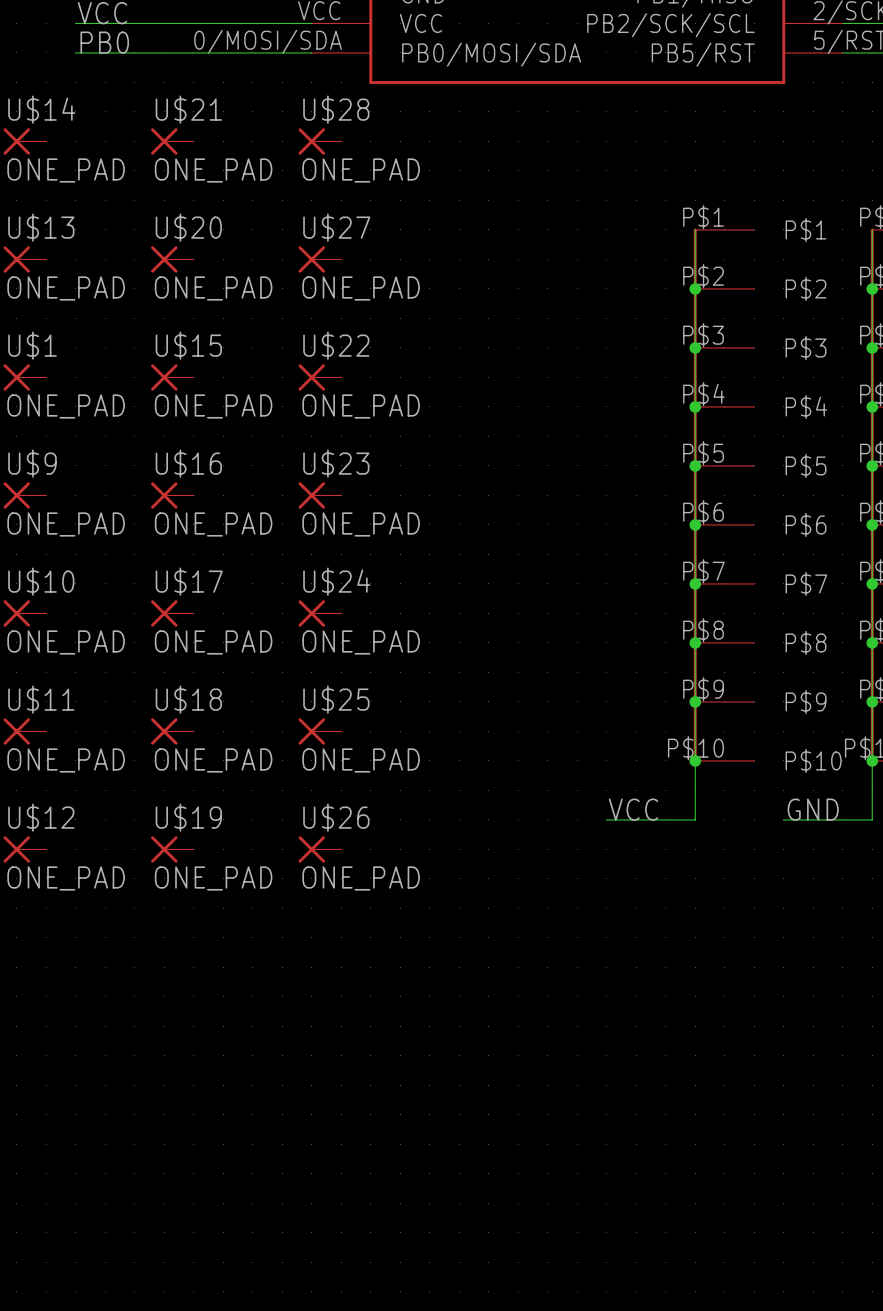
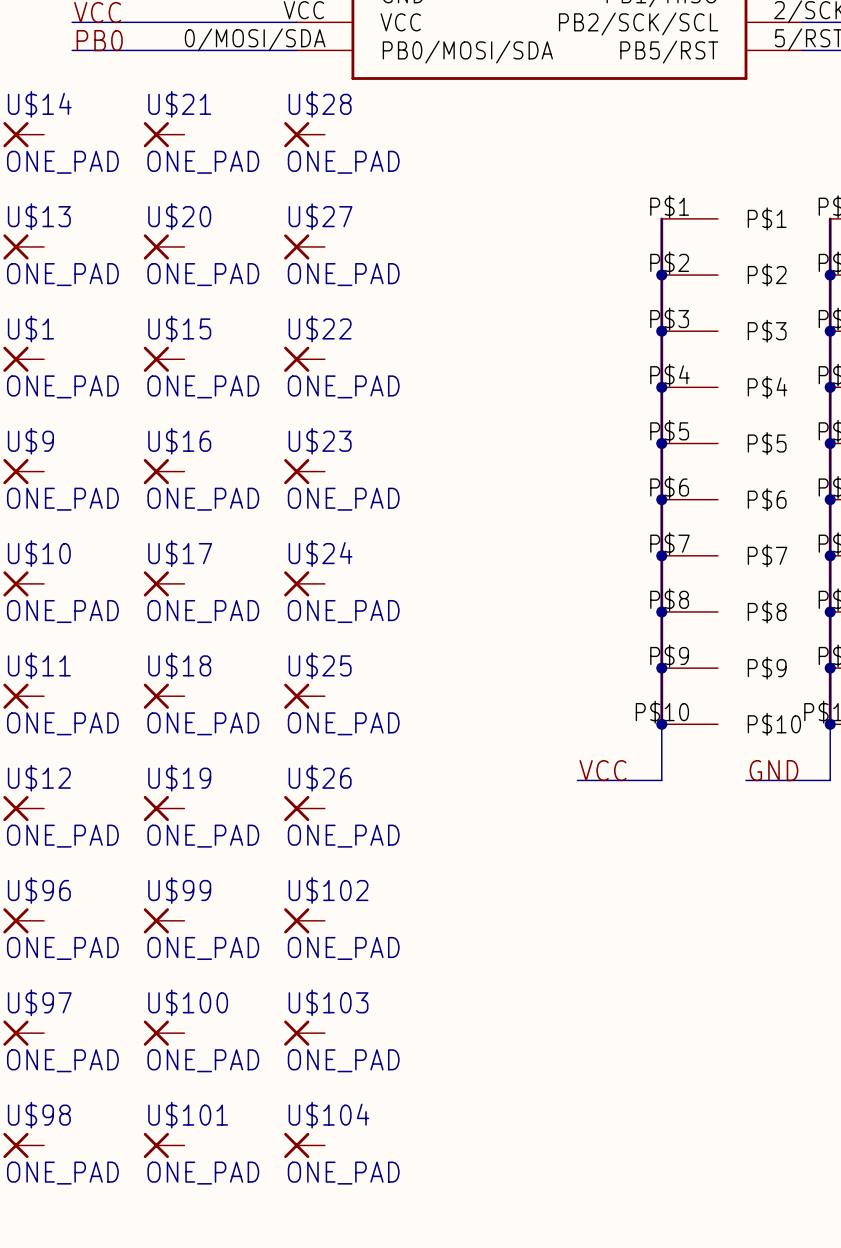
U$96: none -> ONE_PAD (23, 920)
U$99: none -> ONE_PAD (164, 920)
U$102: none -> ONE_PAD (304, 920)
U$97: none -> ONE_PAD (23, 1033)
U$100: none -> ONE_PAD (164, 1033)
U$103: none -> ONE_PAD (304, 1033)
U$98: none -> ONE_PAD (23, 1145)
U$101: none -> ONE_PAD (164, 1145)
U$104: none -> ONE_PAD (304, 1145)

